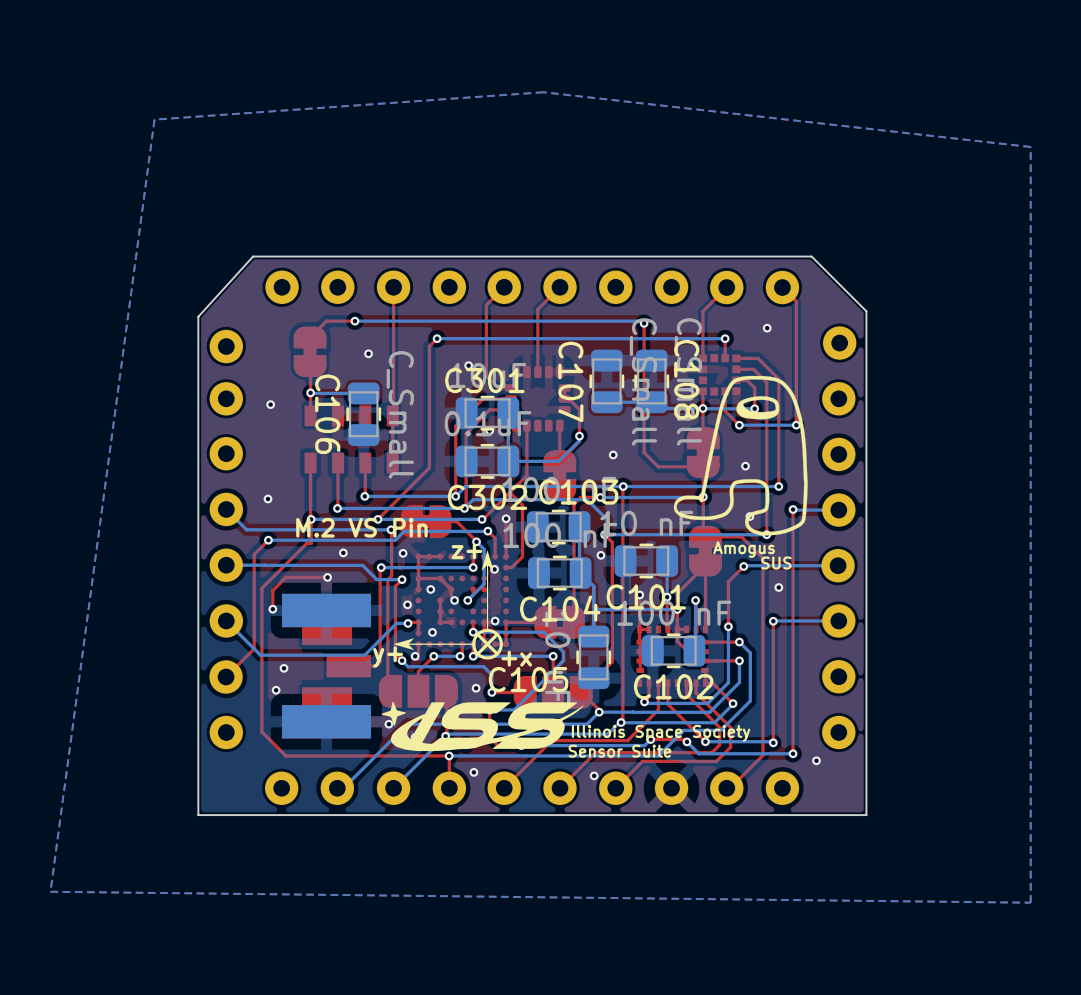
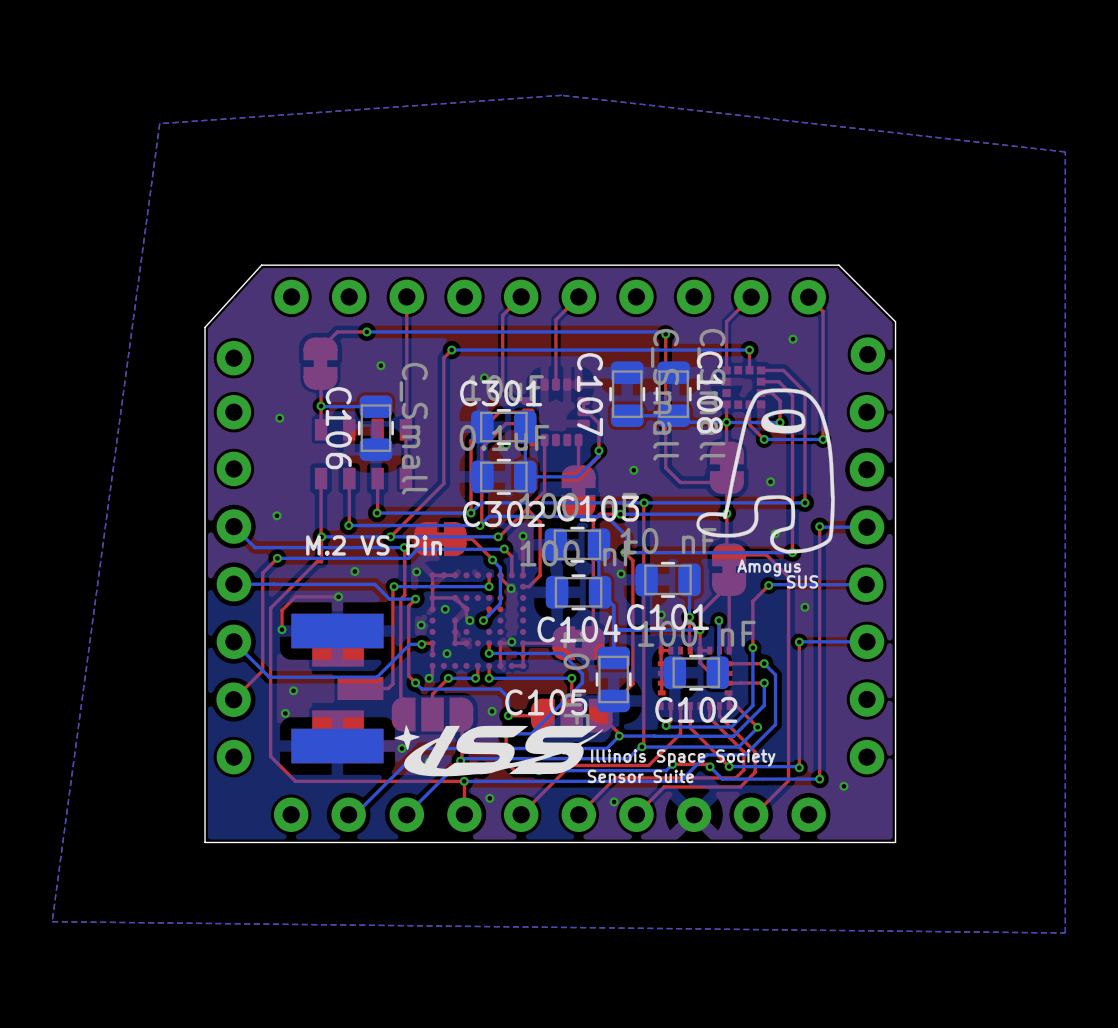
drawing: [393, 550, 503, 660] -> none
text: z+ (466, 551) -> none
text: y+ (388, 657) -> none
text: +x (516, 658) -> none

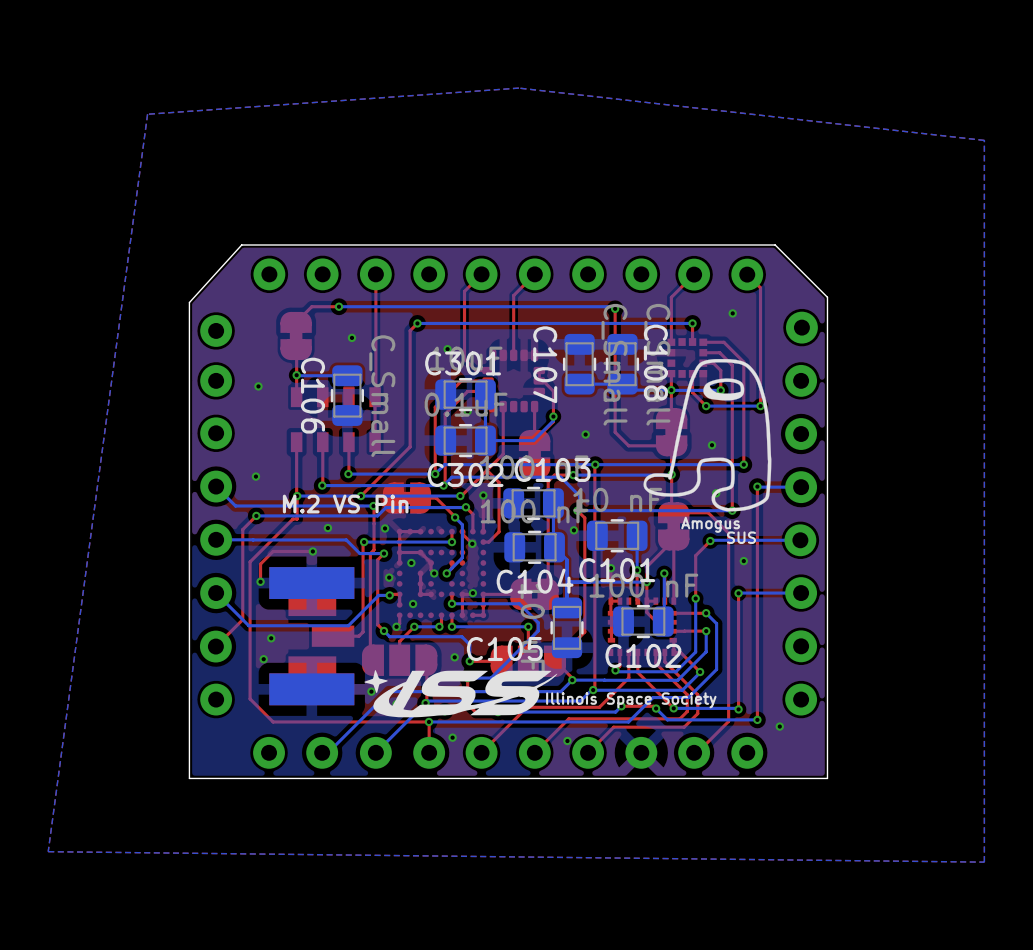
text: Sensor Suite (640, 776) -> none

